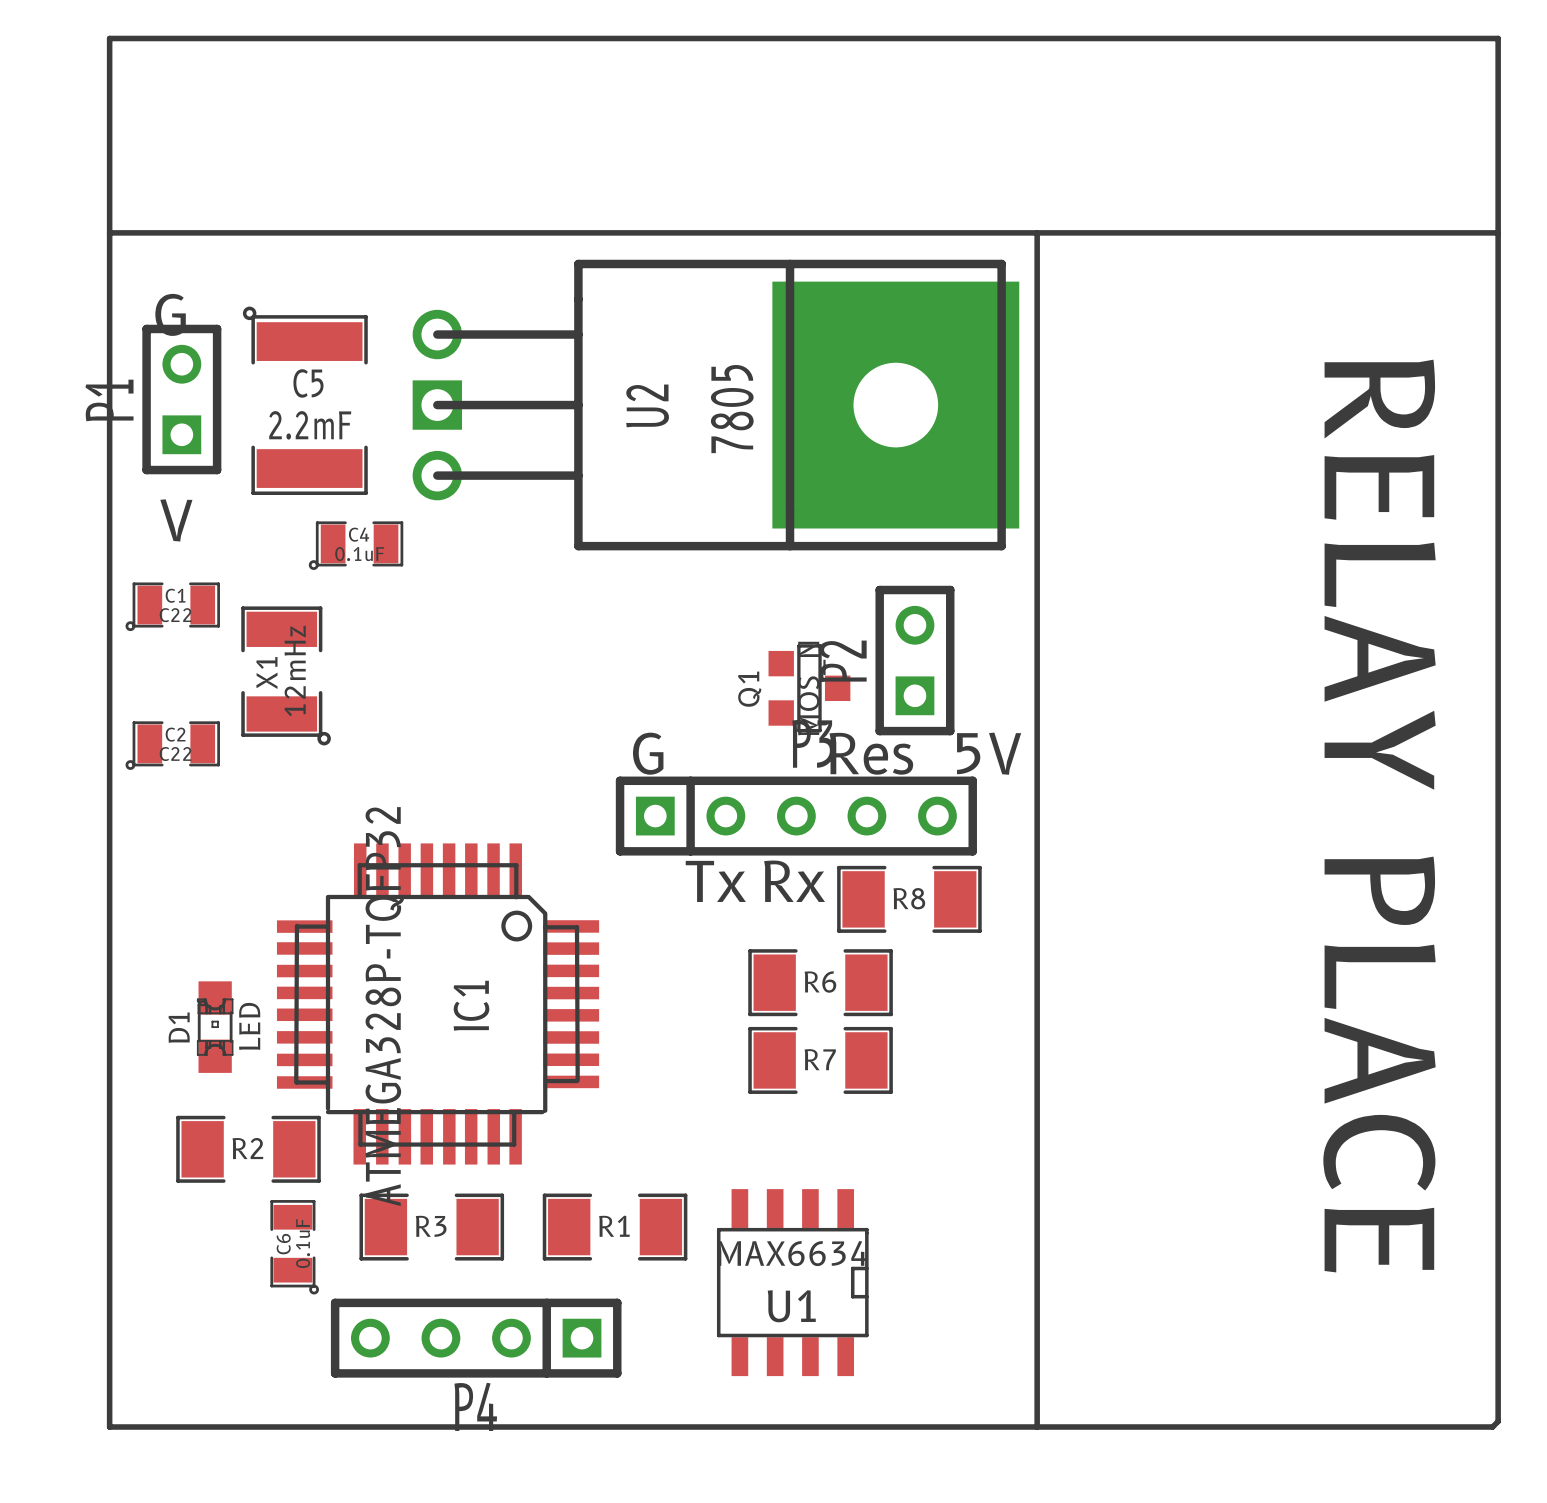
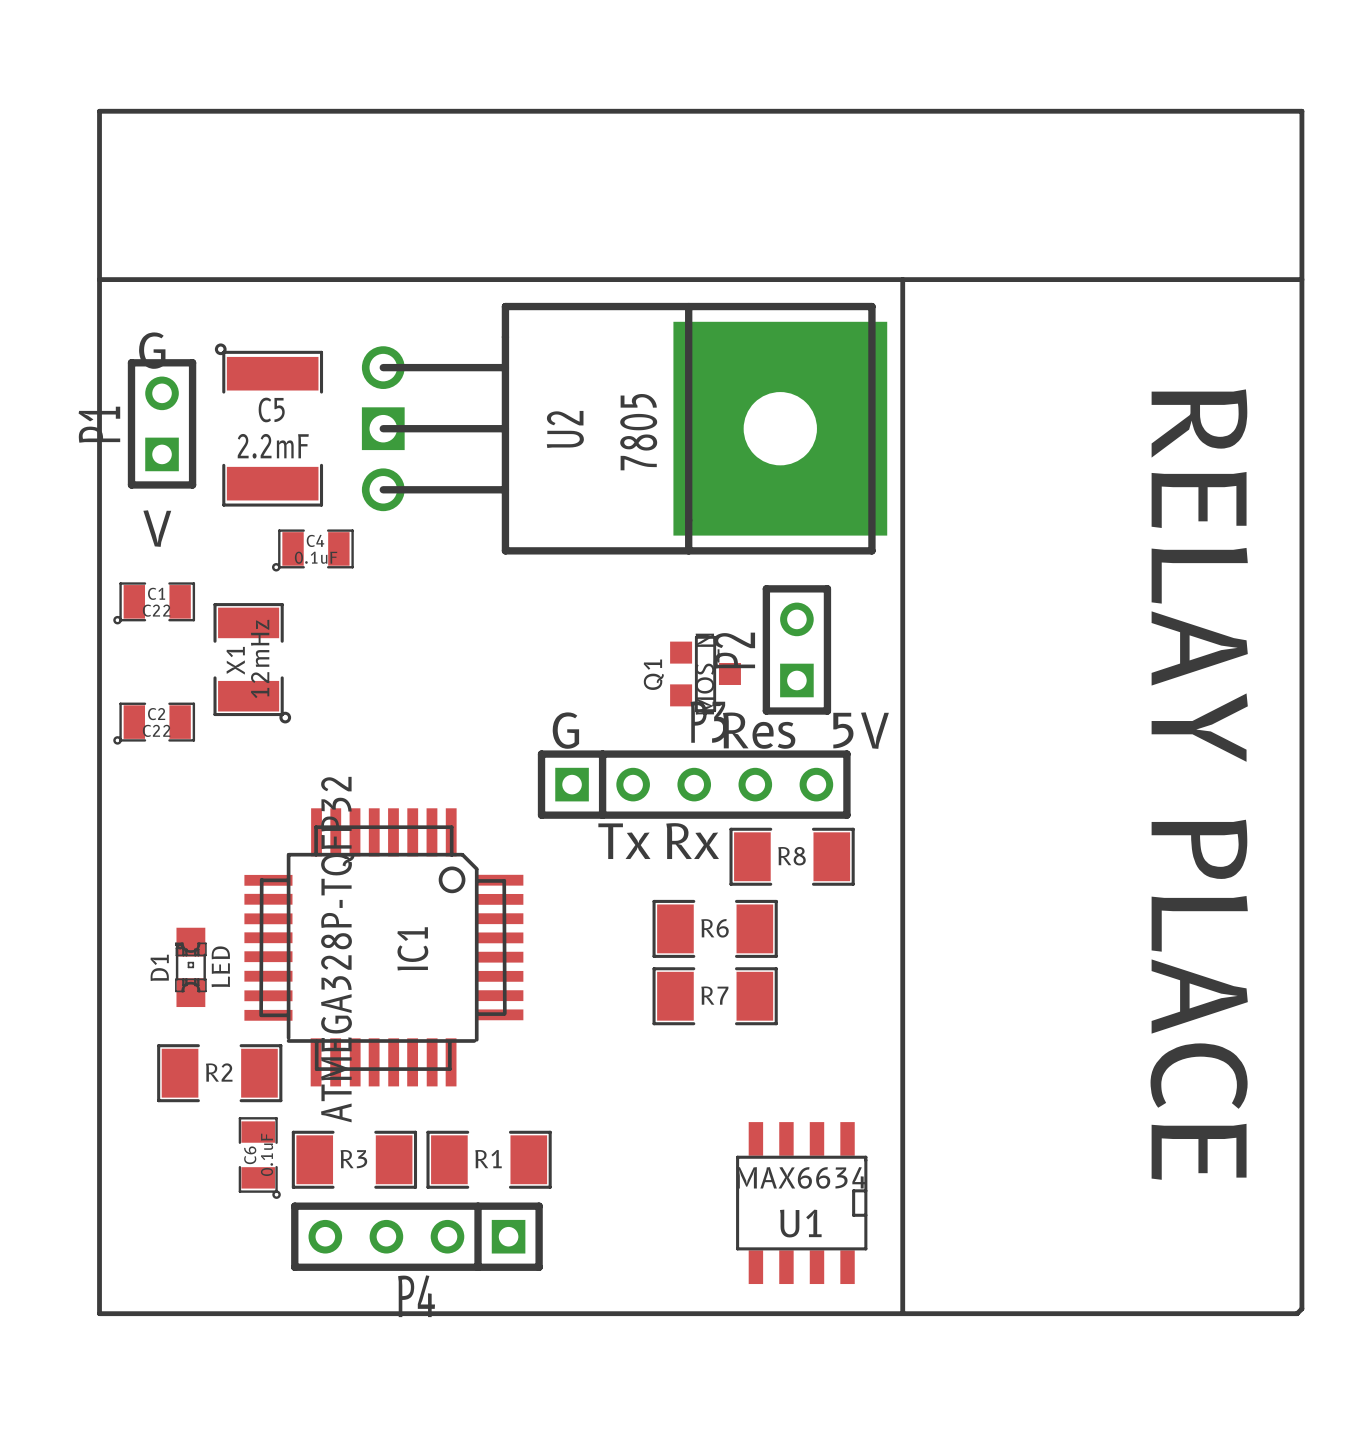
R3 position: (431, 1227) -> (354, 1159)
R1 position: (615, 1227) -> (489, 1159)
U1 position: (792, 1282) -> (801, 1203)

